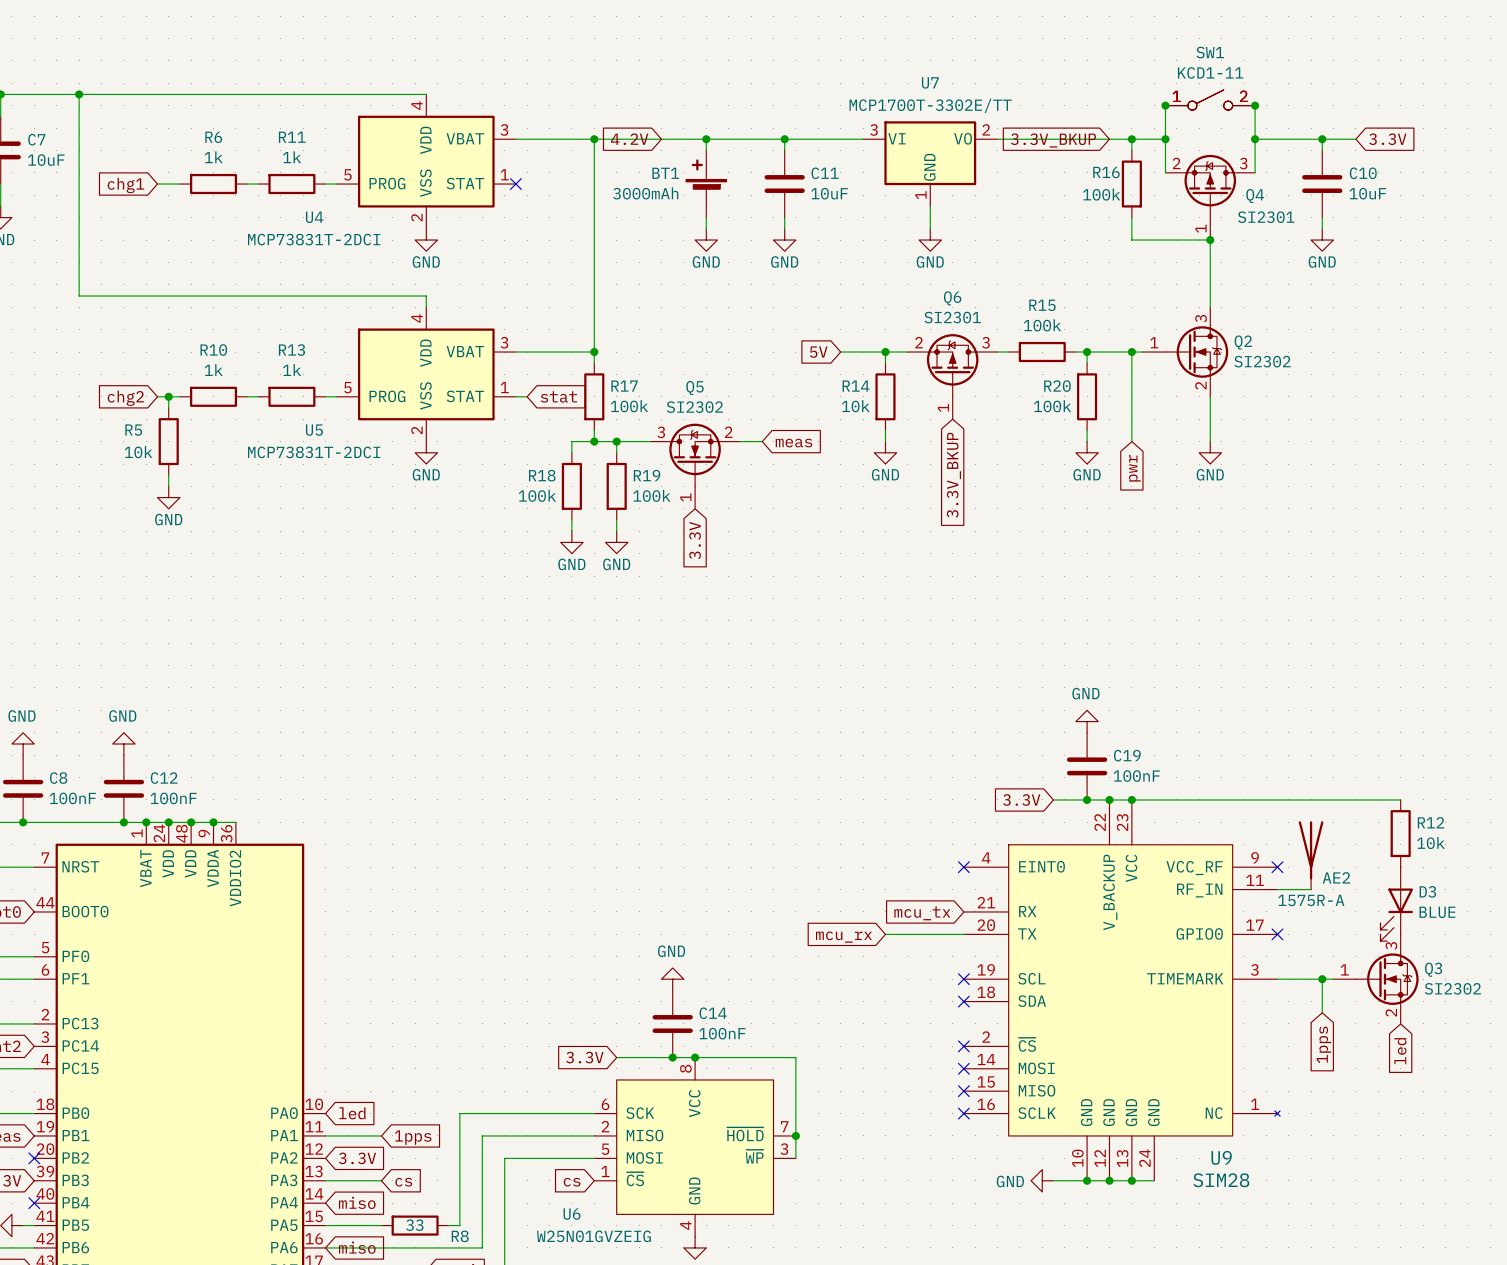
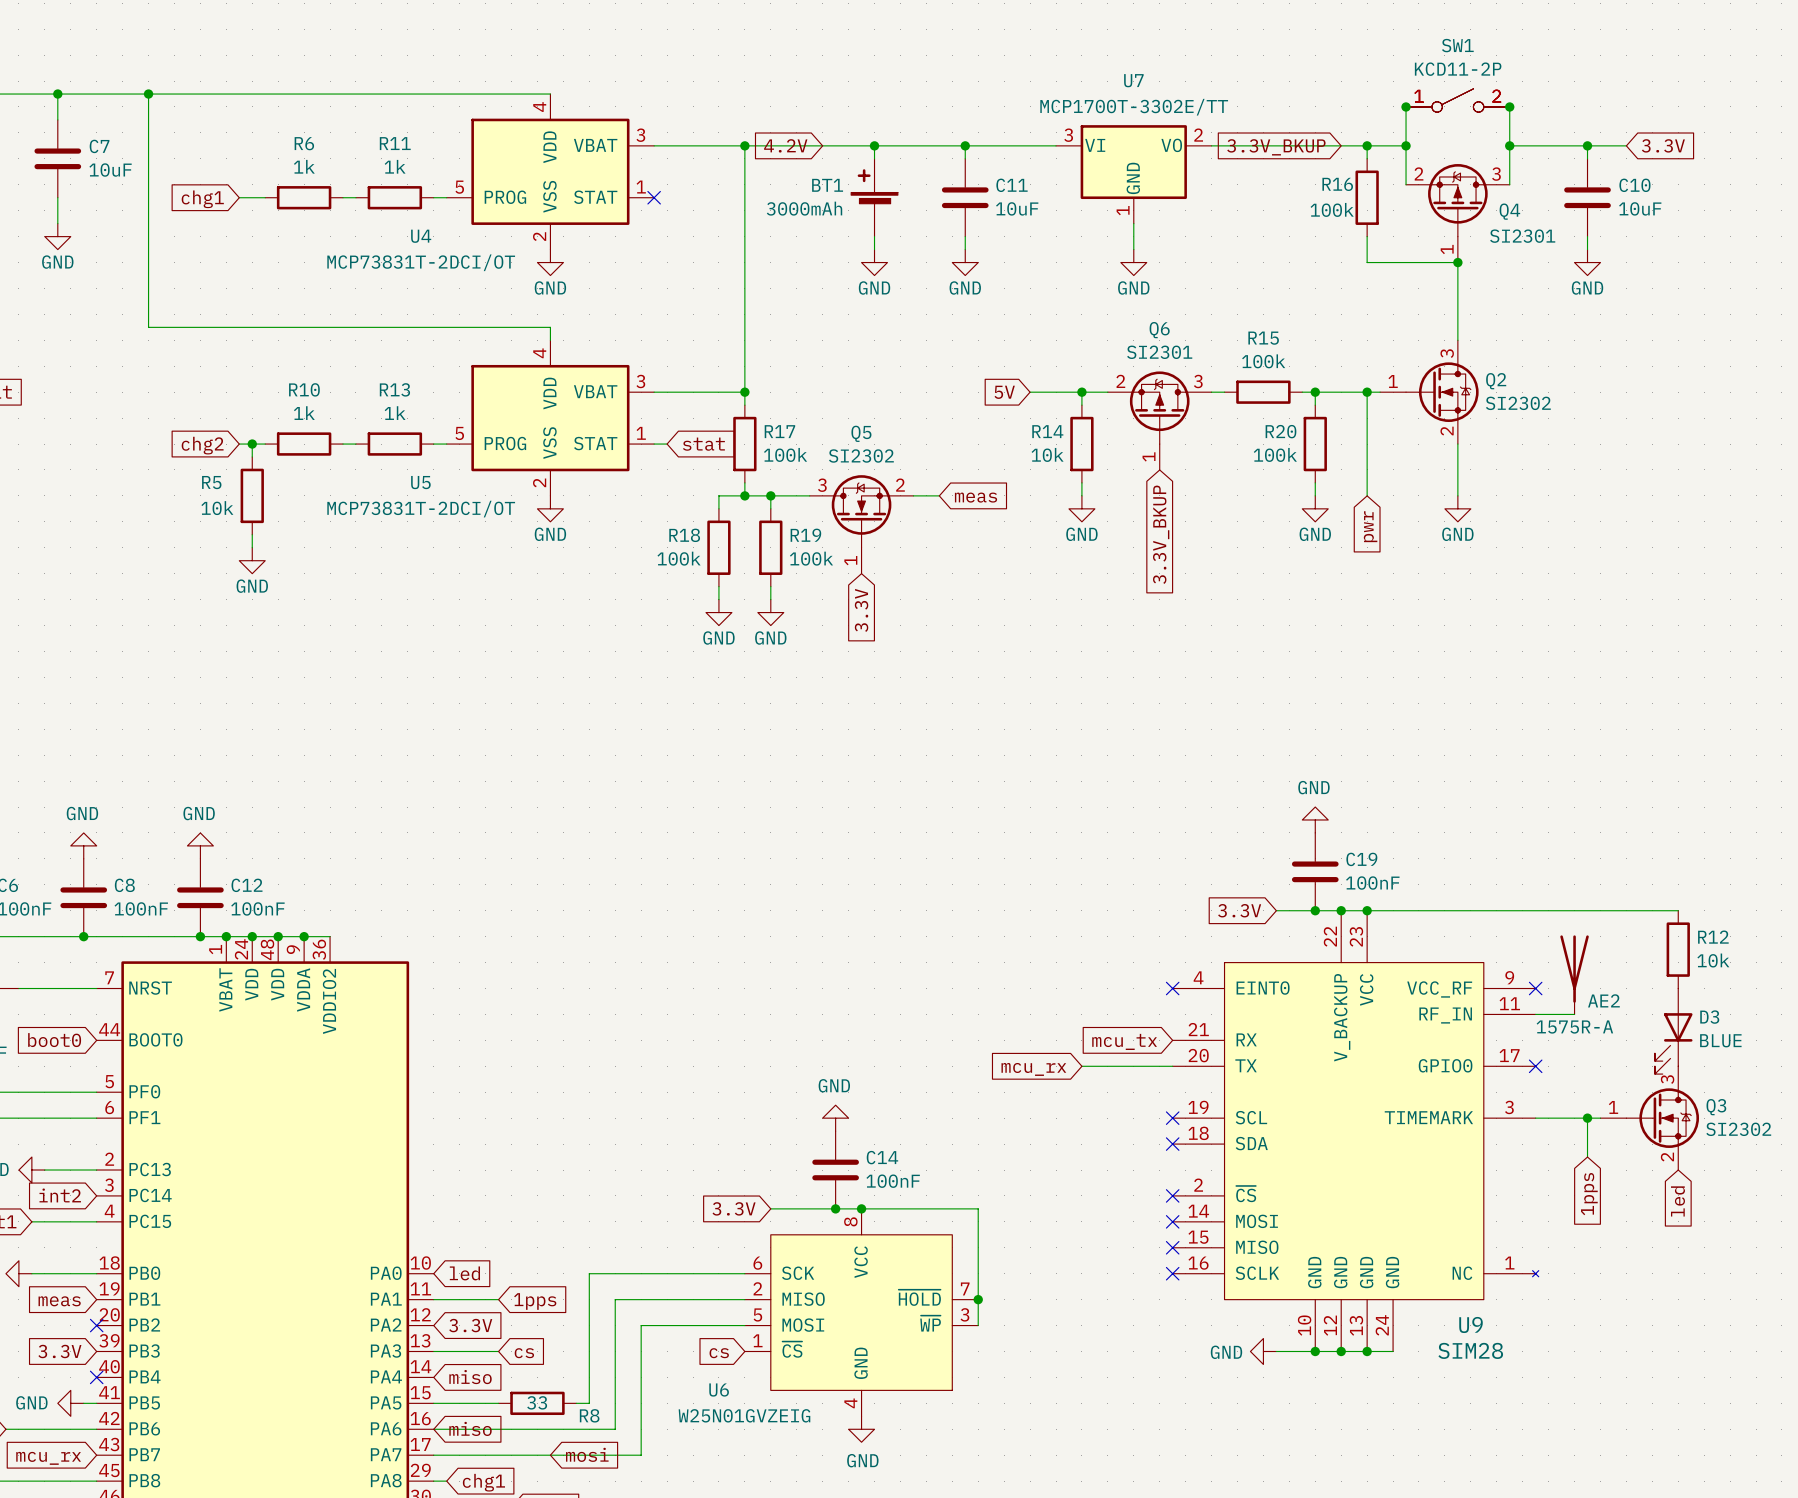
SW1 value: KCD1-11 (1210, 72) -> KCD11-2P (1458, 69)
U4 value: MCP73831T-2DCI (314, 239) -> MCP73831T-2DCI/OT (421, 262)
U5 value: MCP73831T-2DCI (314, 452) -> MCP73831T-2DCI/OT (421, 509)

